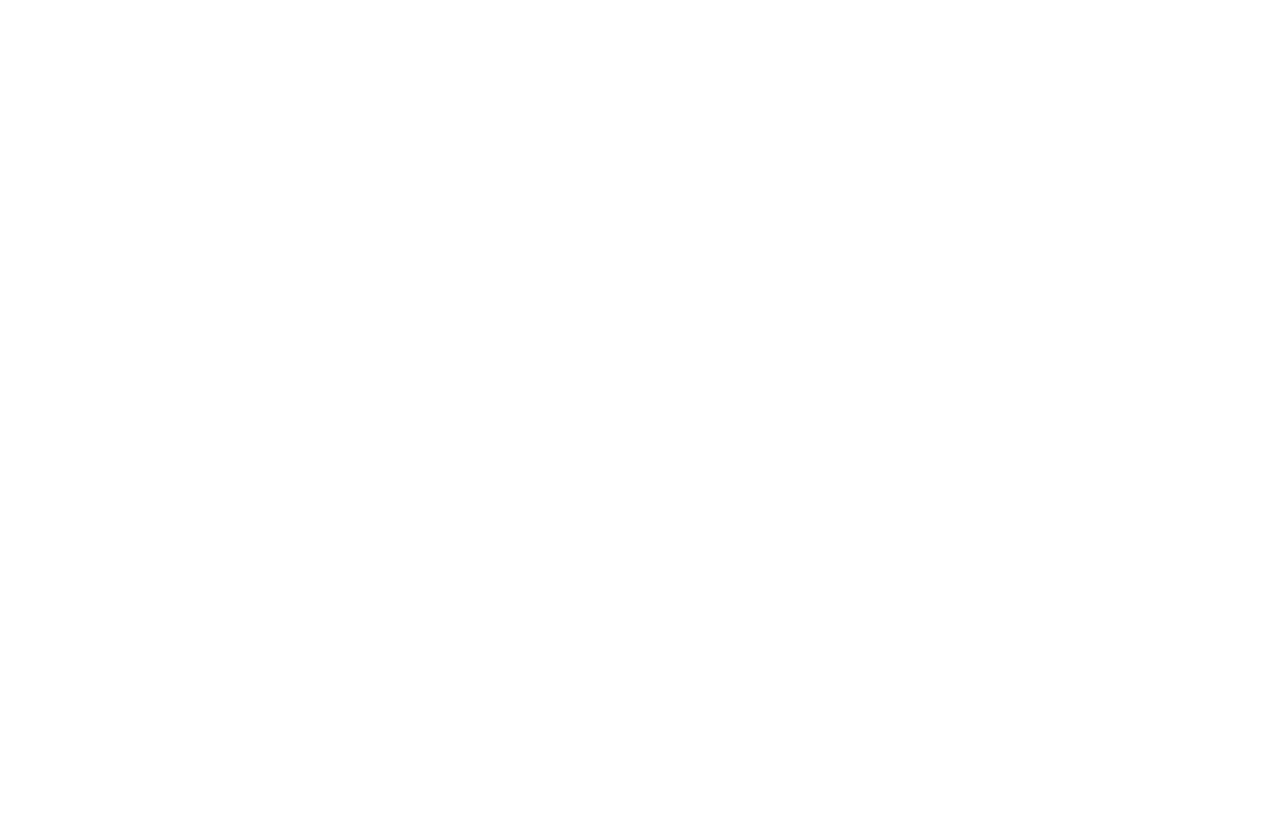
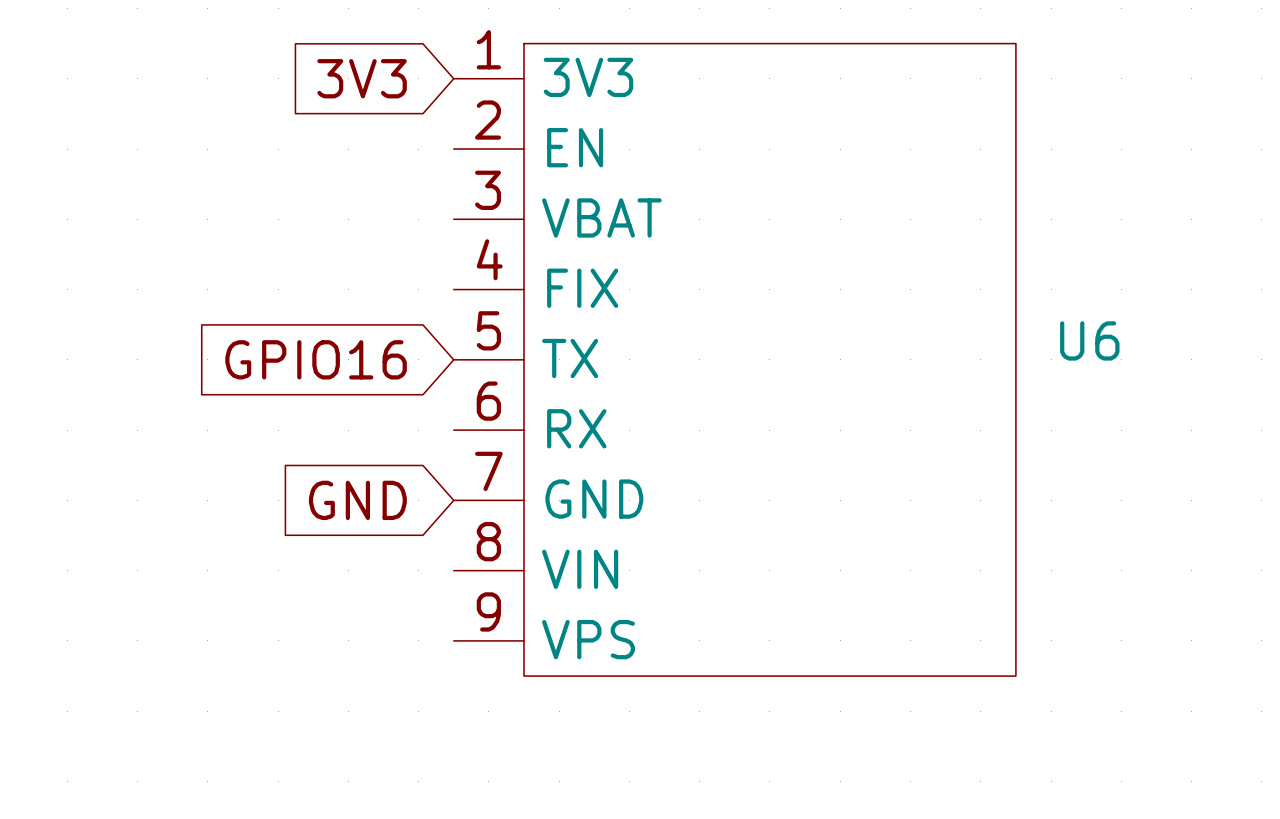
global label: none -> 3V3 (362, 78)
global label: none -> GPIO16 (316, 359)
U6: none -> (734, 359)
global label: none -> GND (357, 500)

